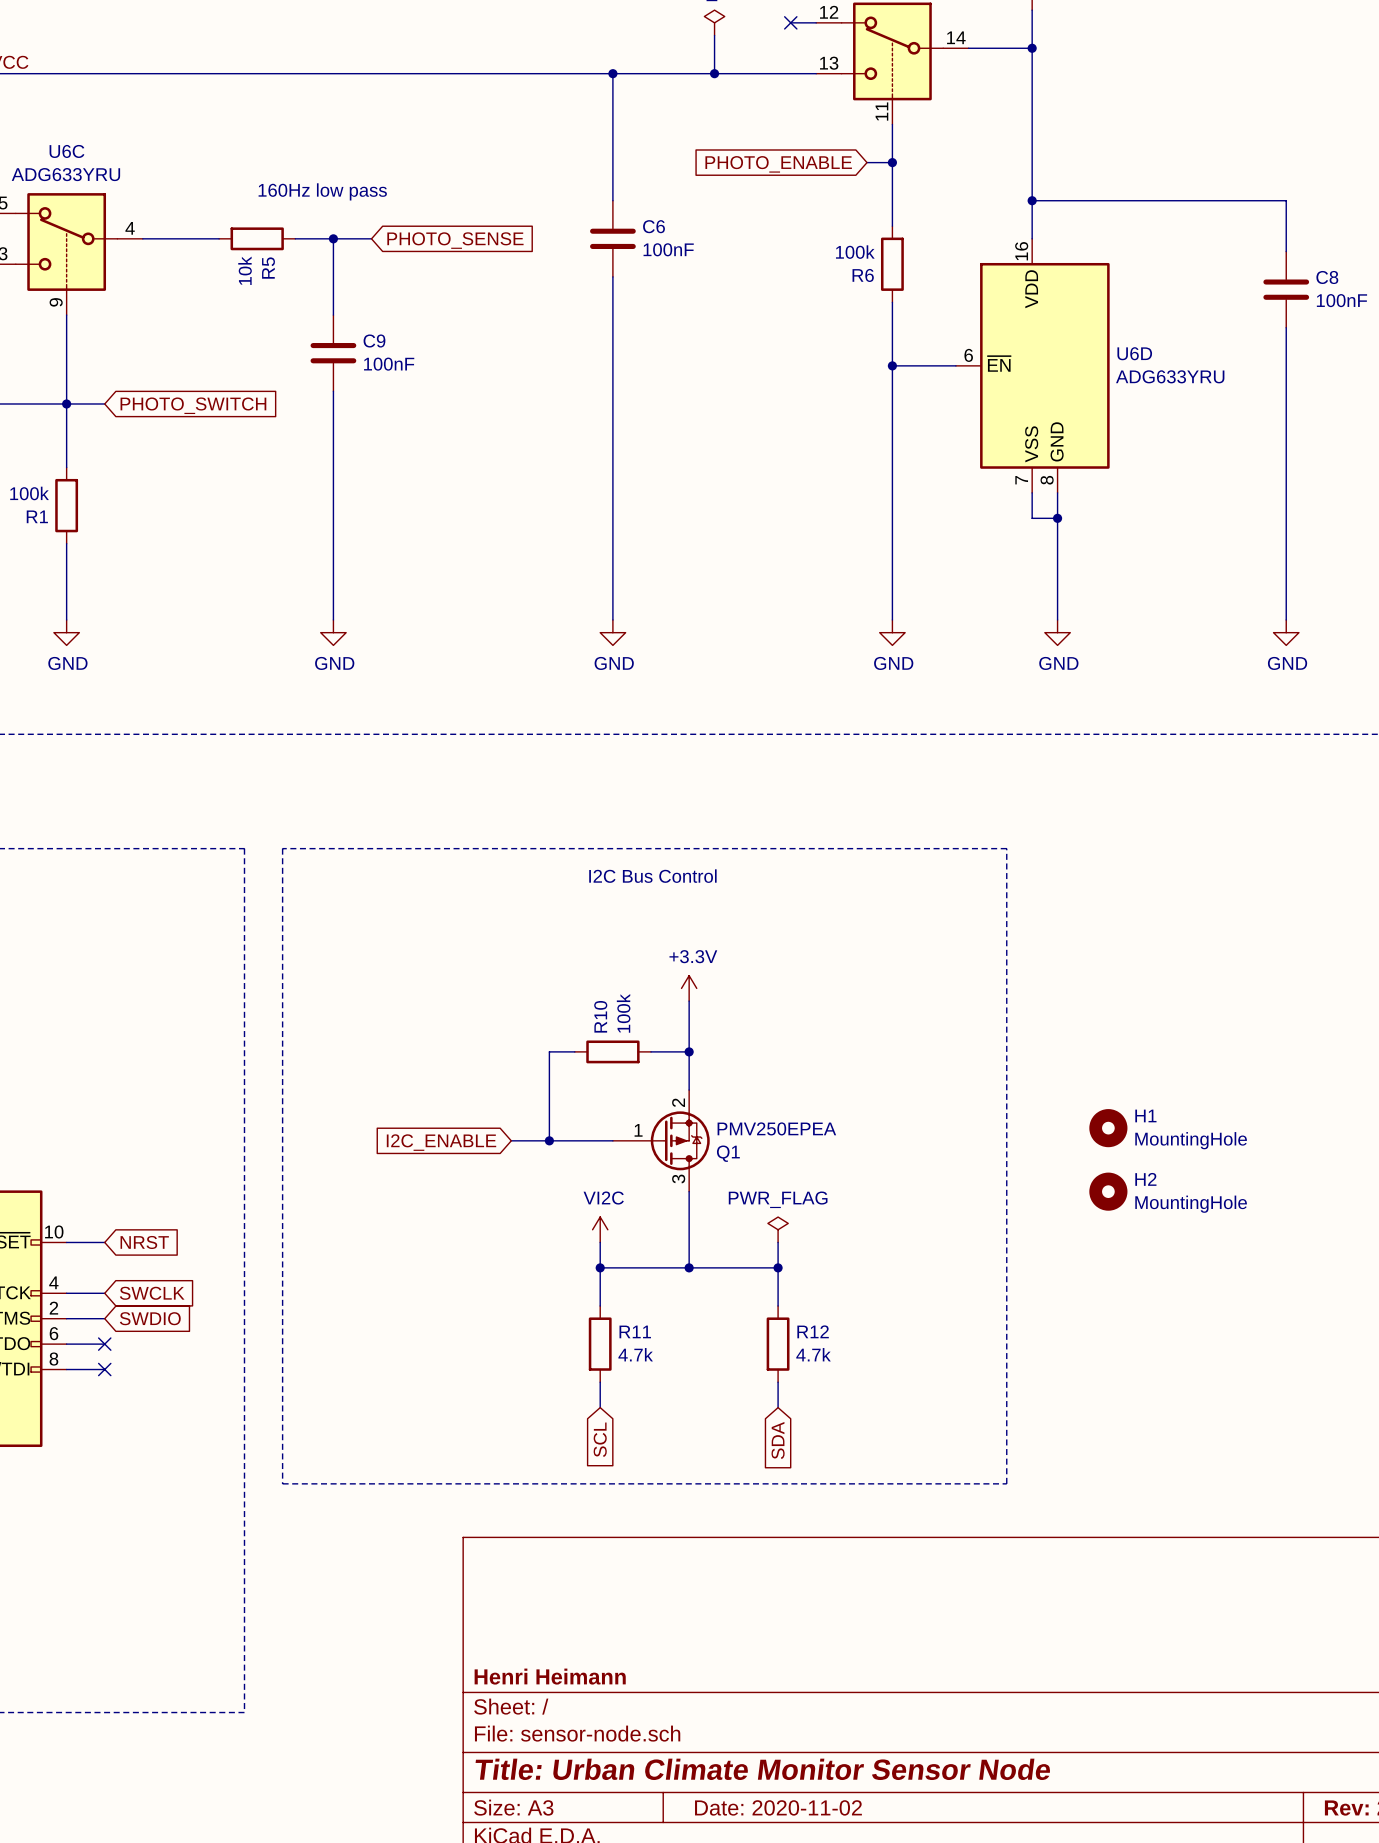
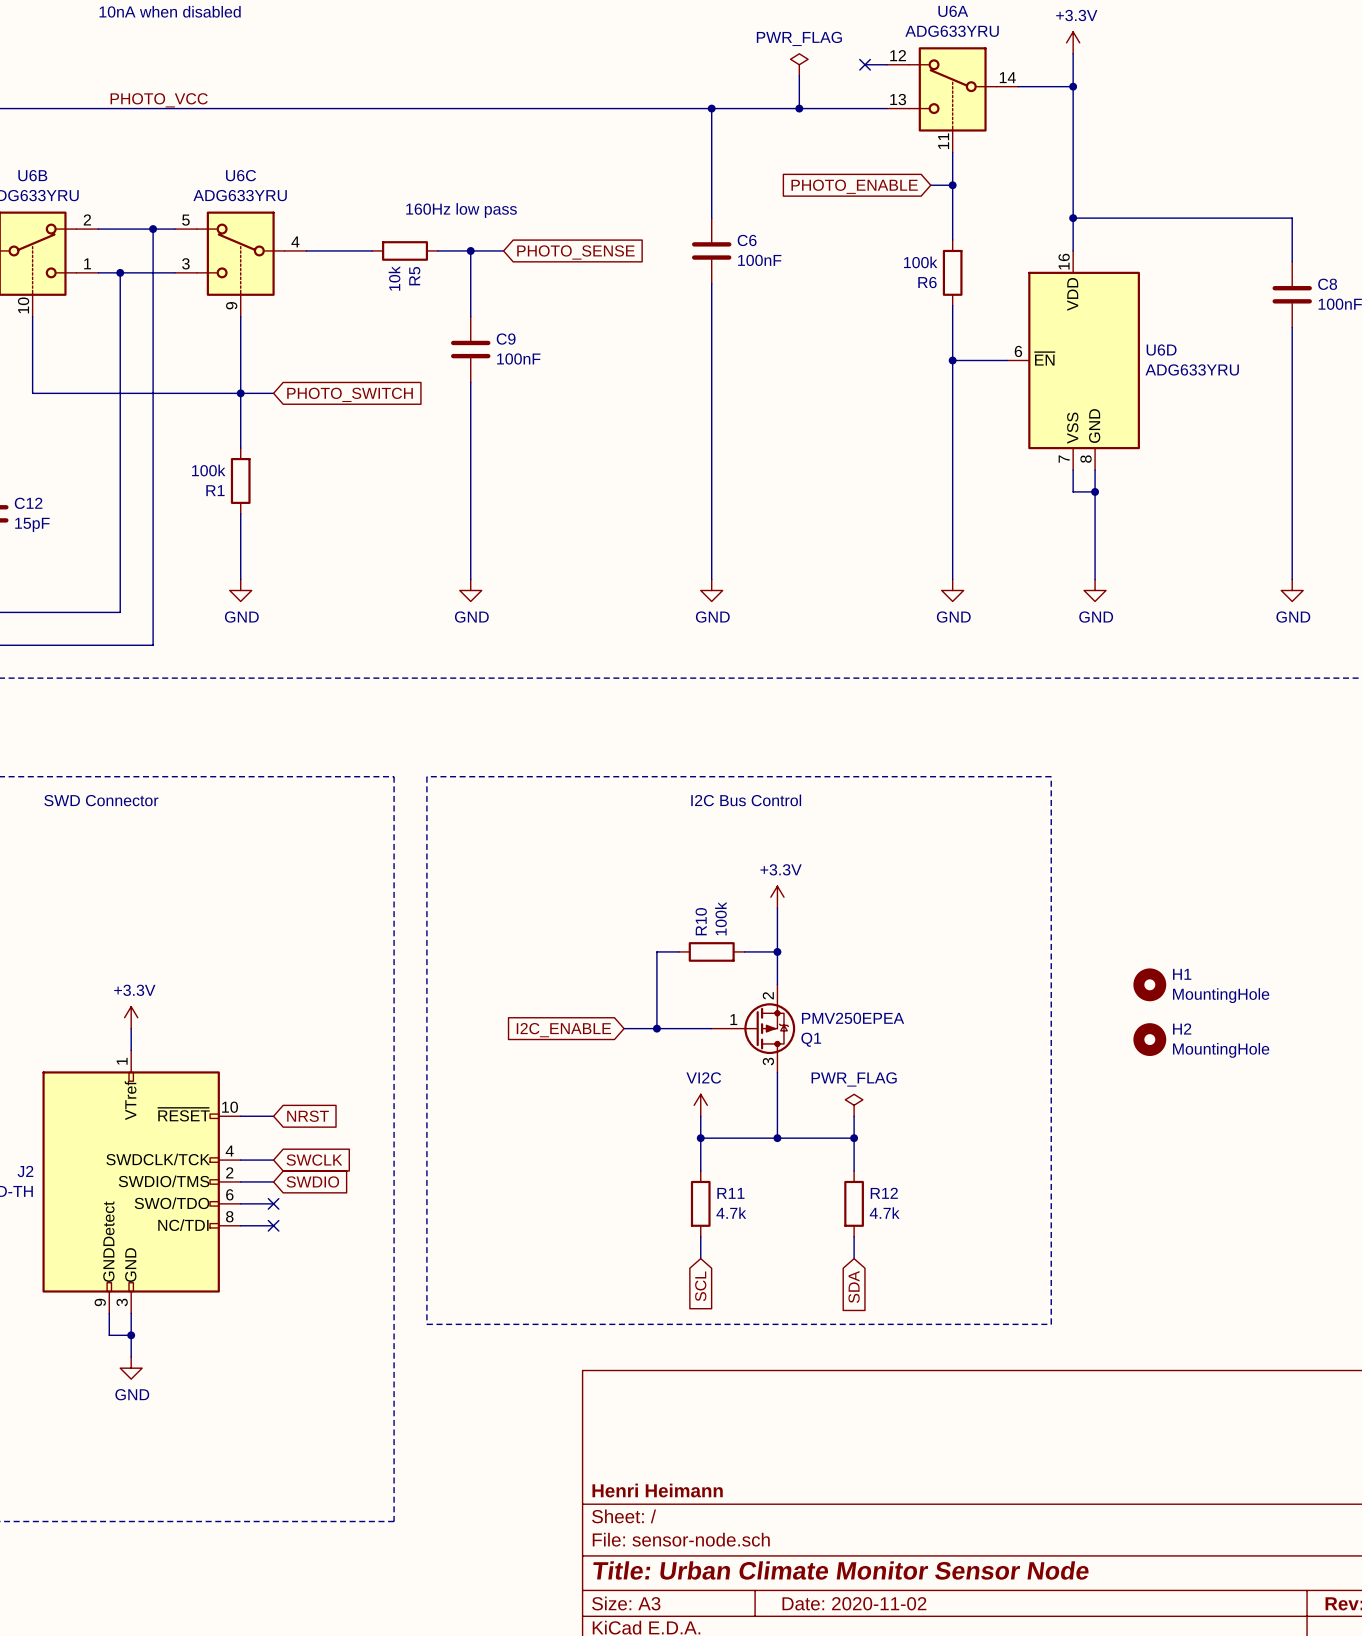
H1 position: (1108, 1128) -> (1149, 984)
H2 position: (1108, 1191) -> (1149, 1039)

